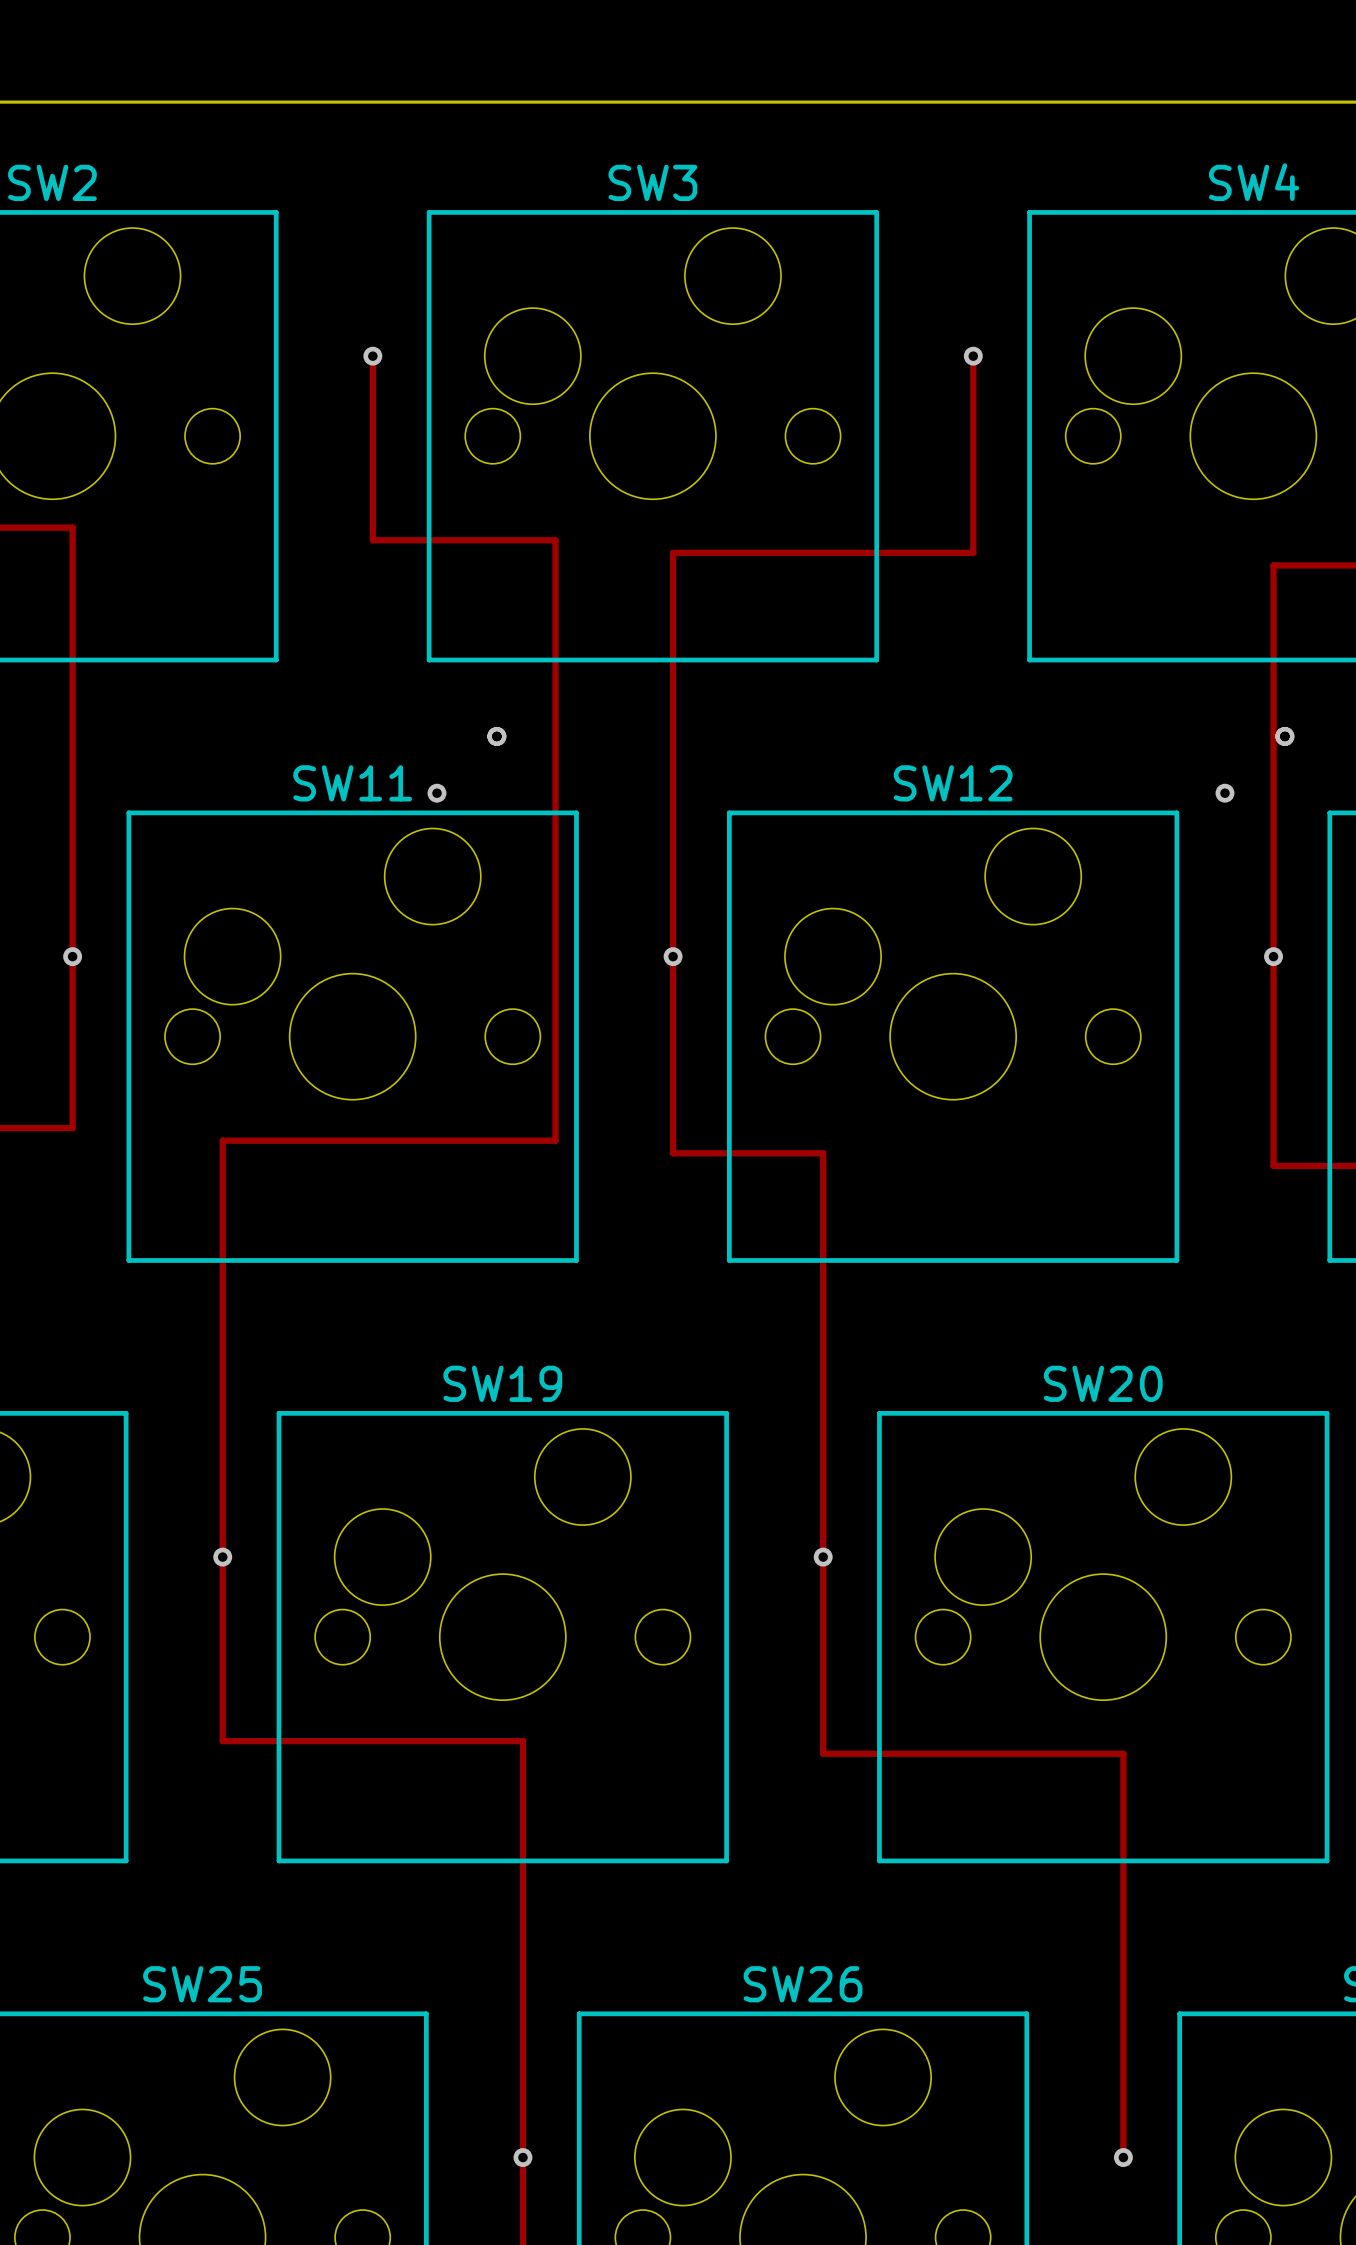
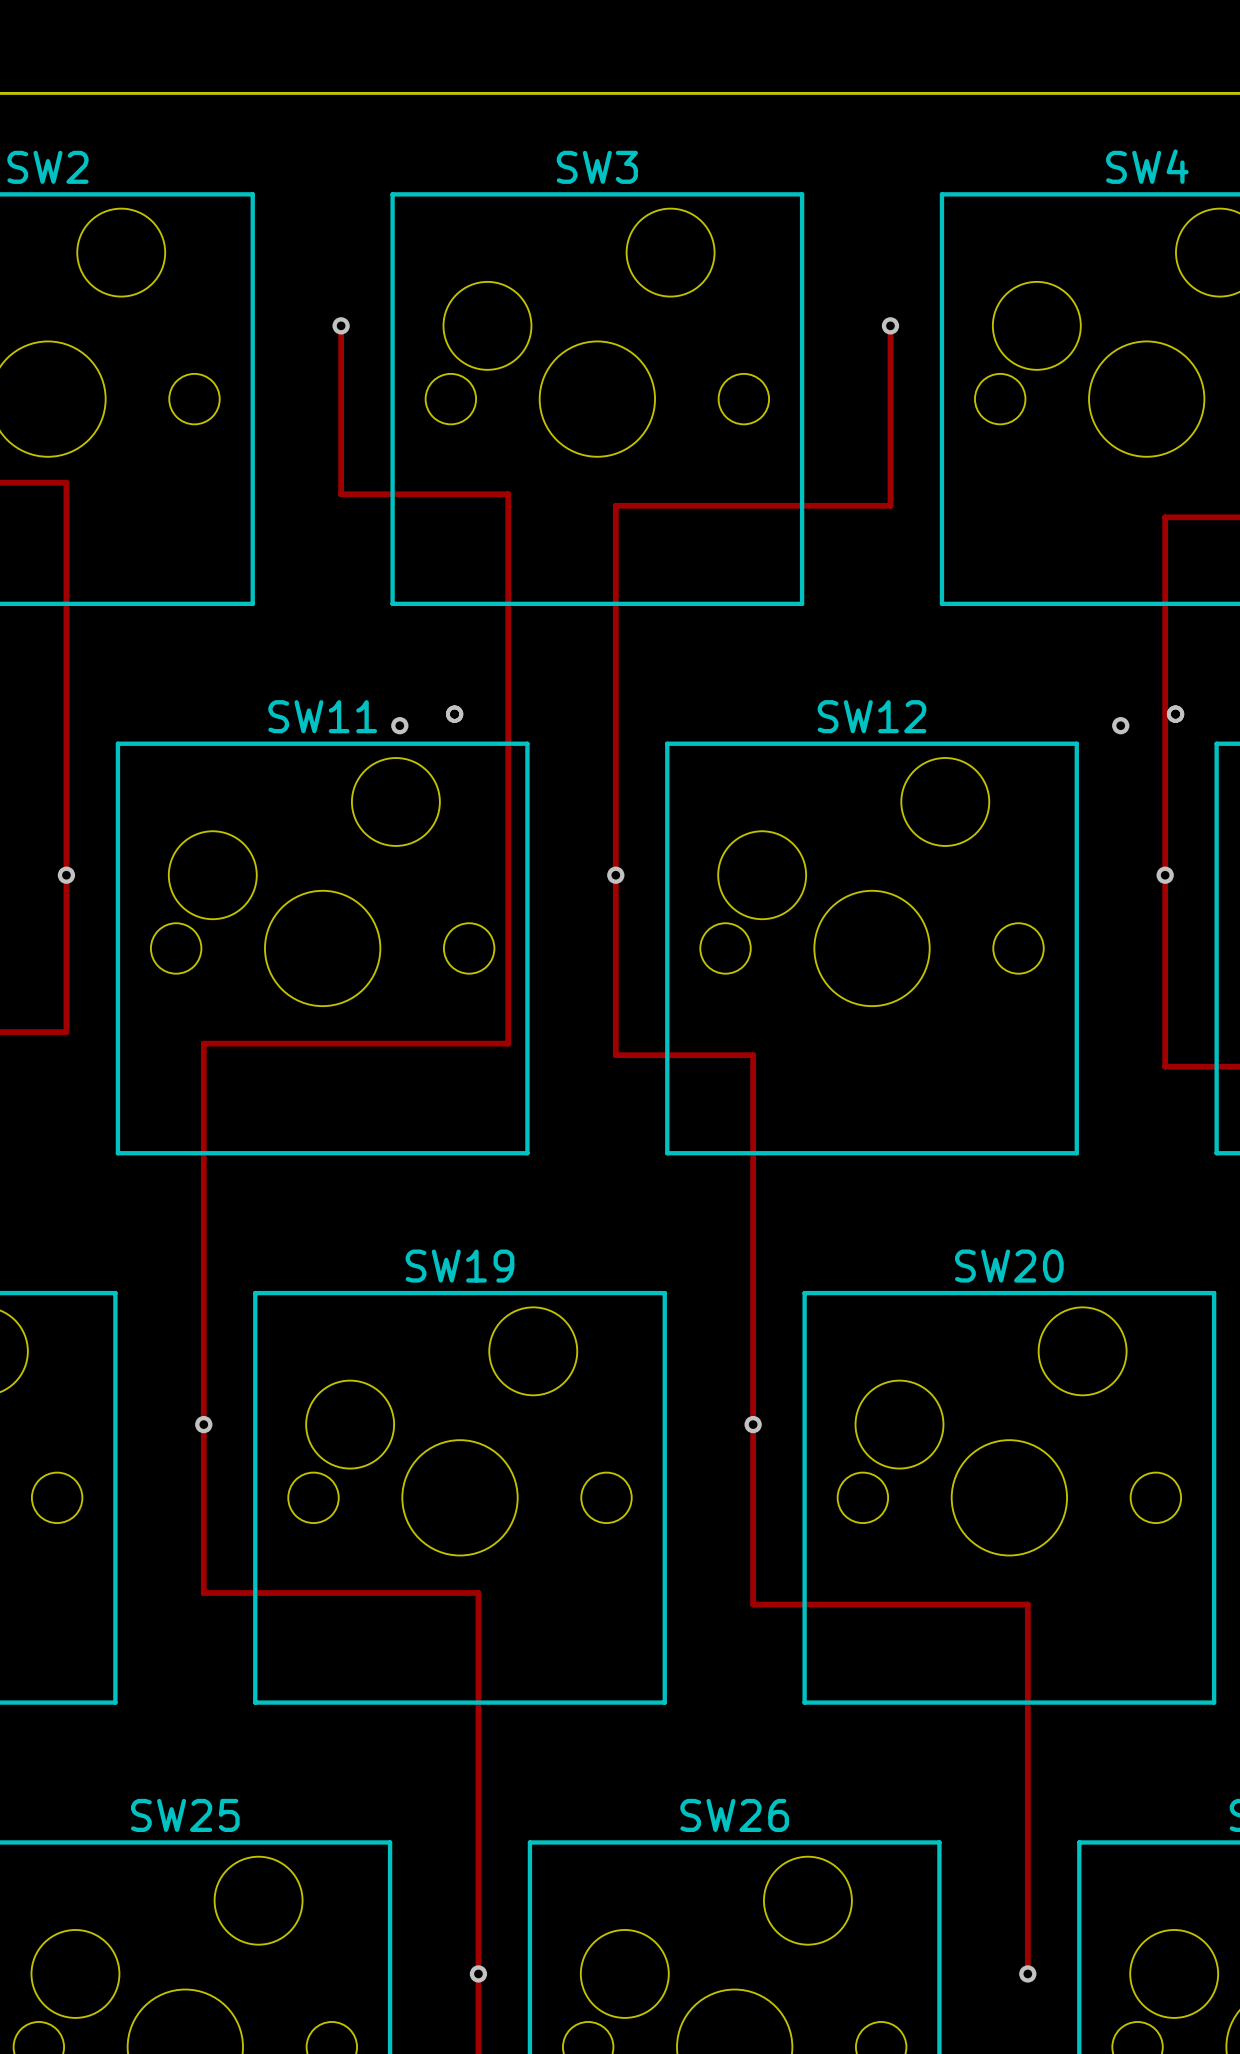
via position: (496, 736) -> (454, 714)
via position: (1284, 736) -> (1175, 714)

